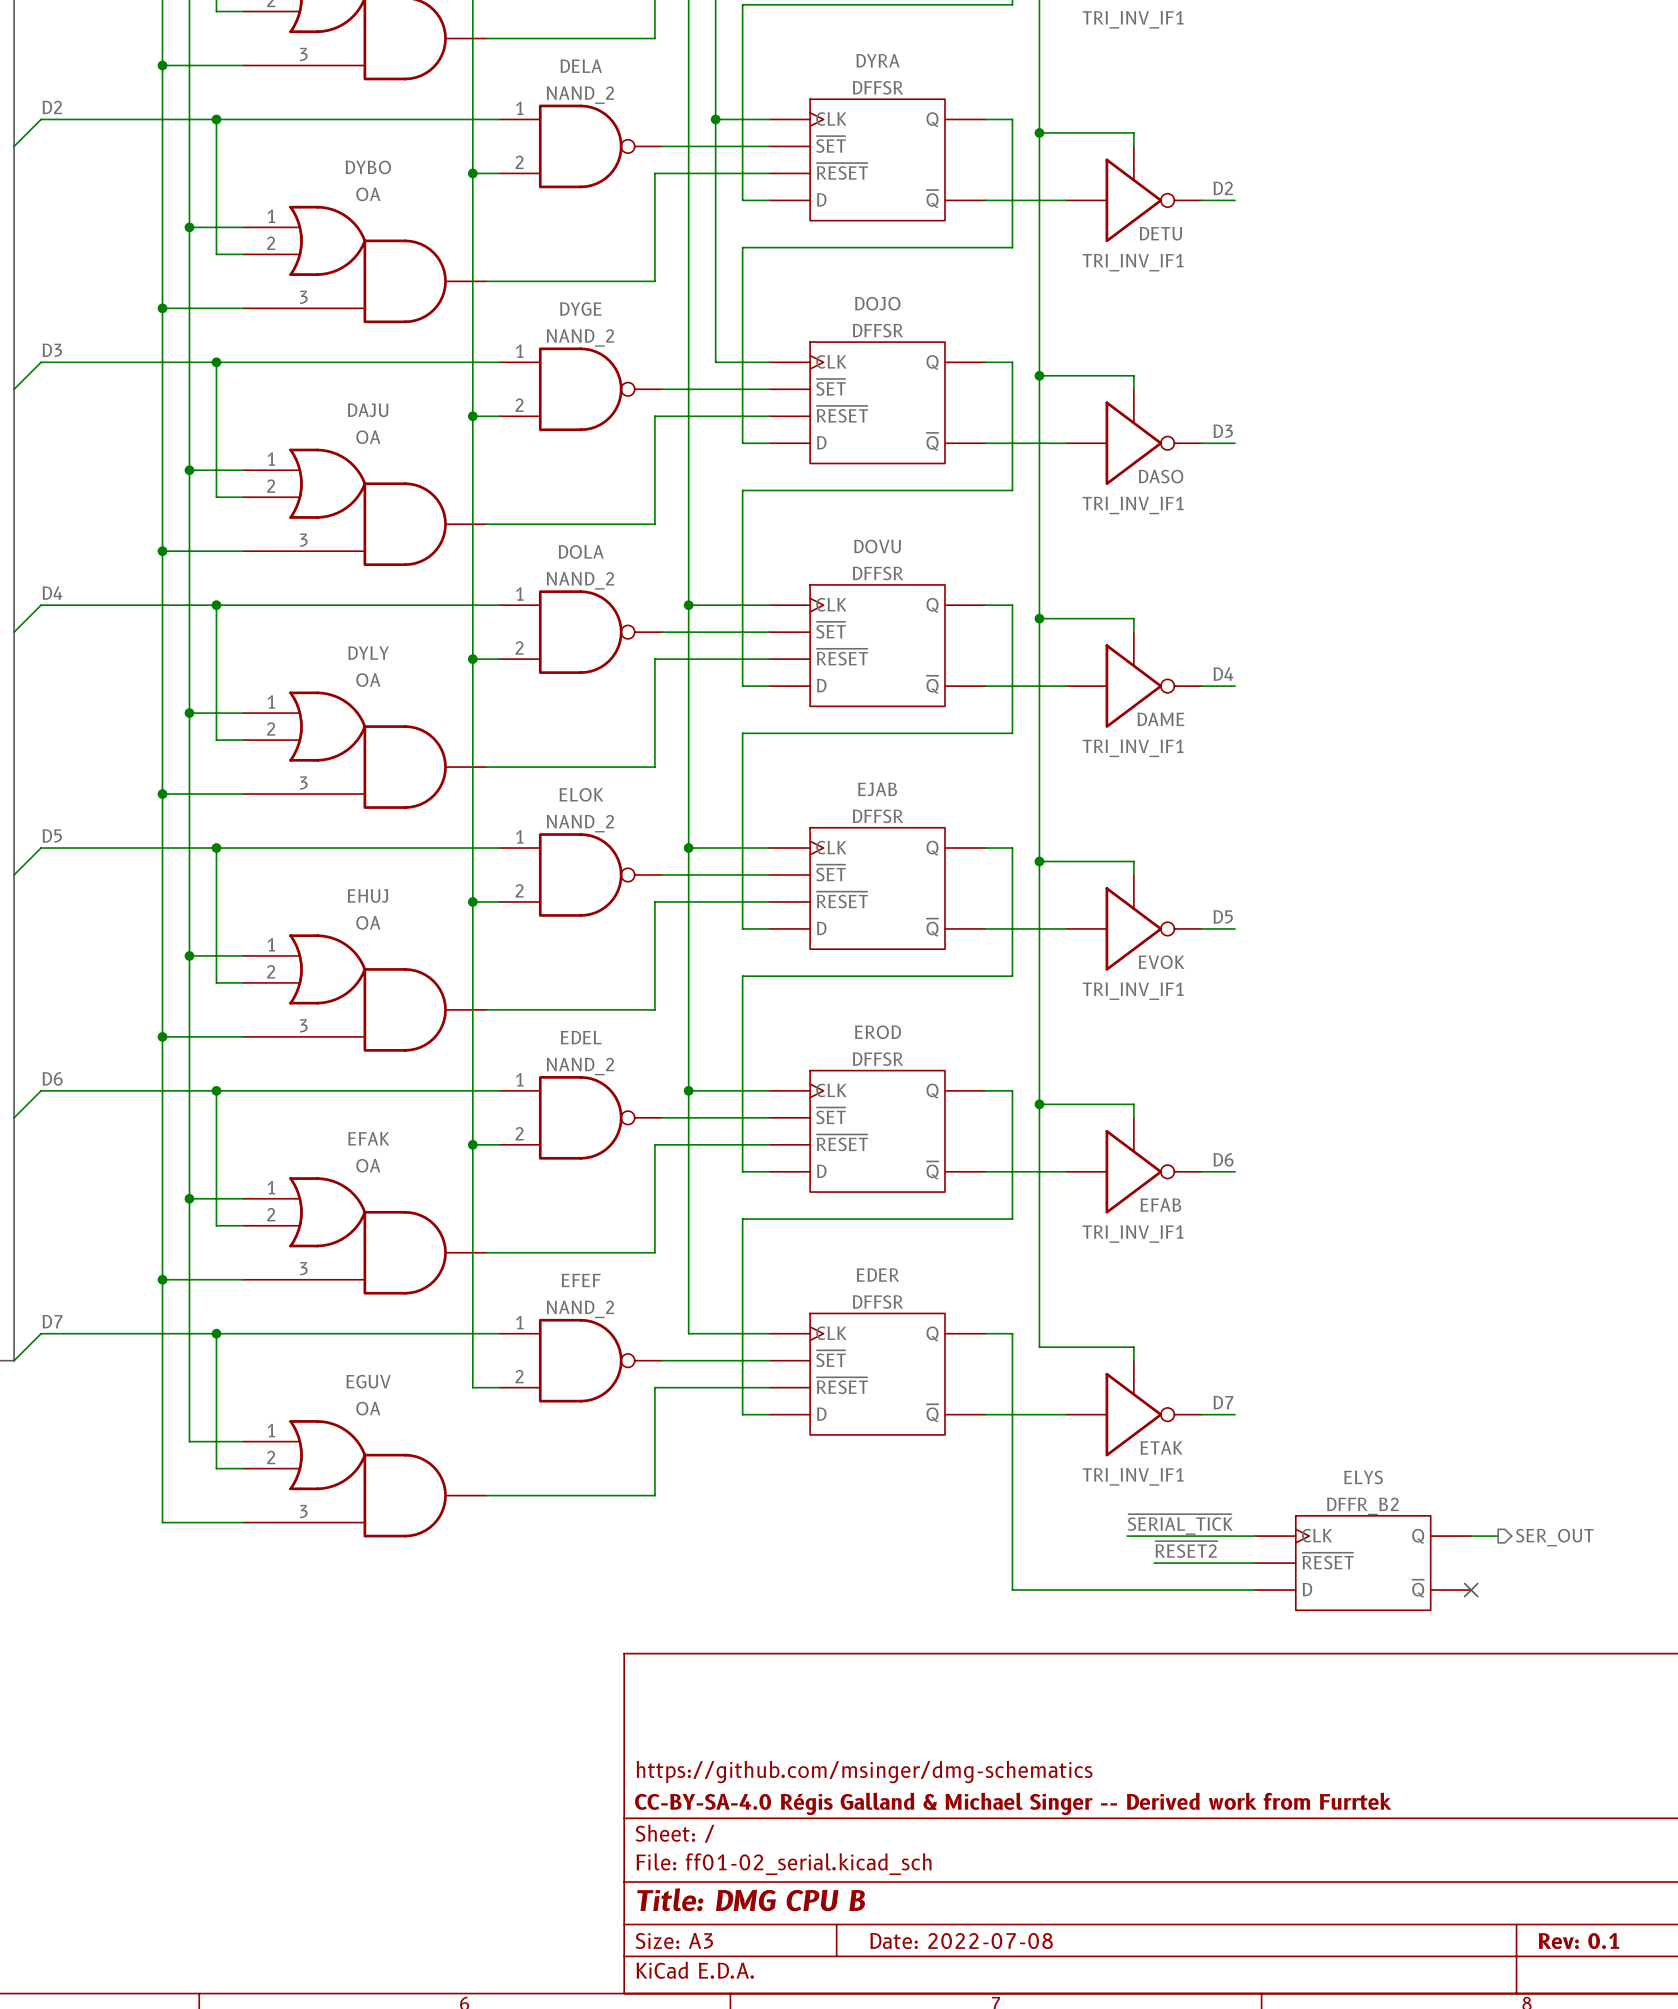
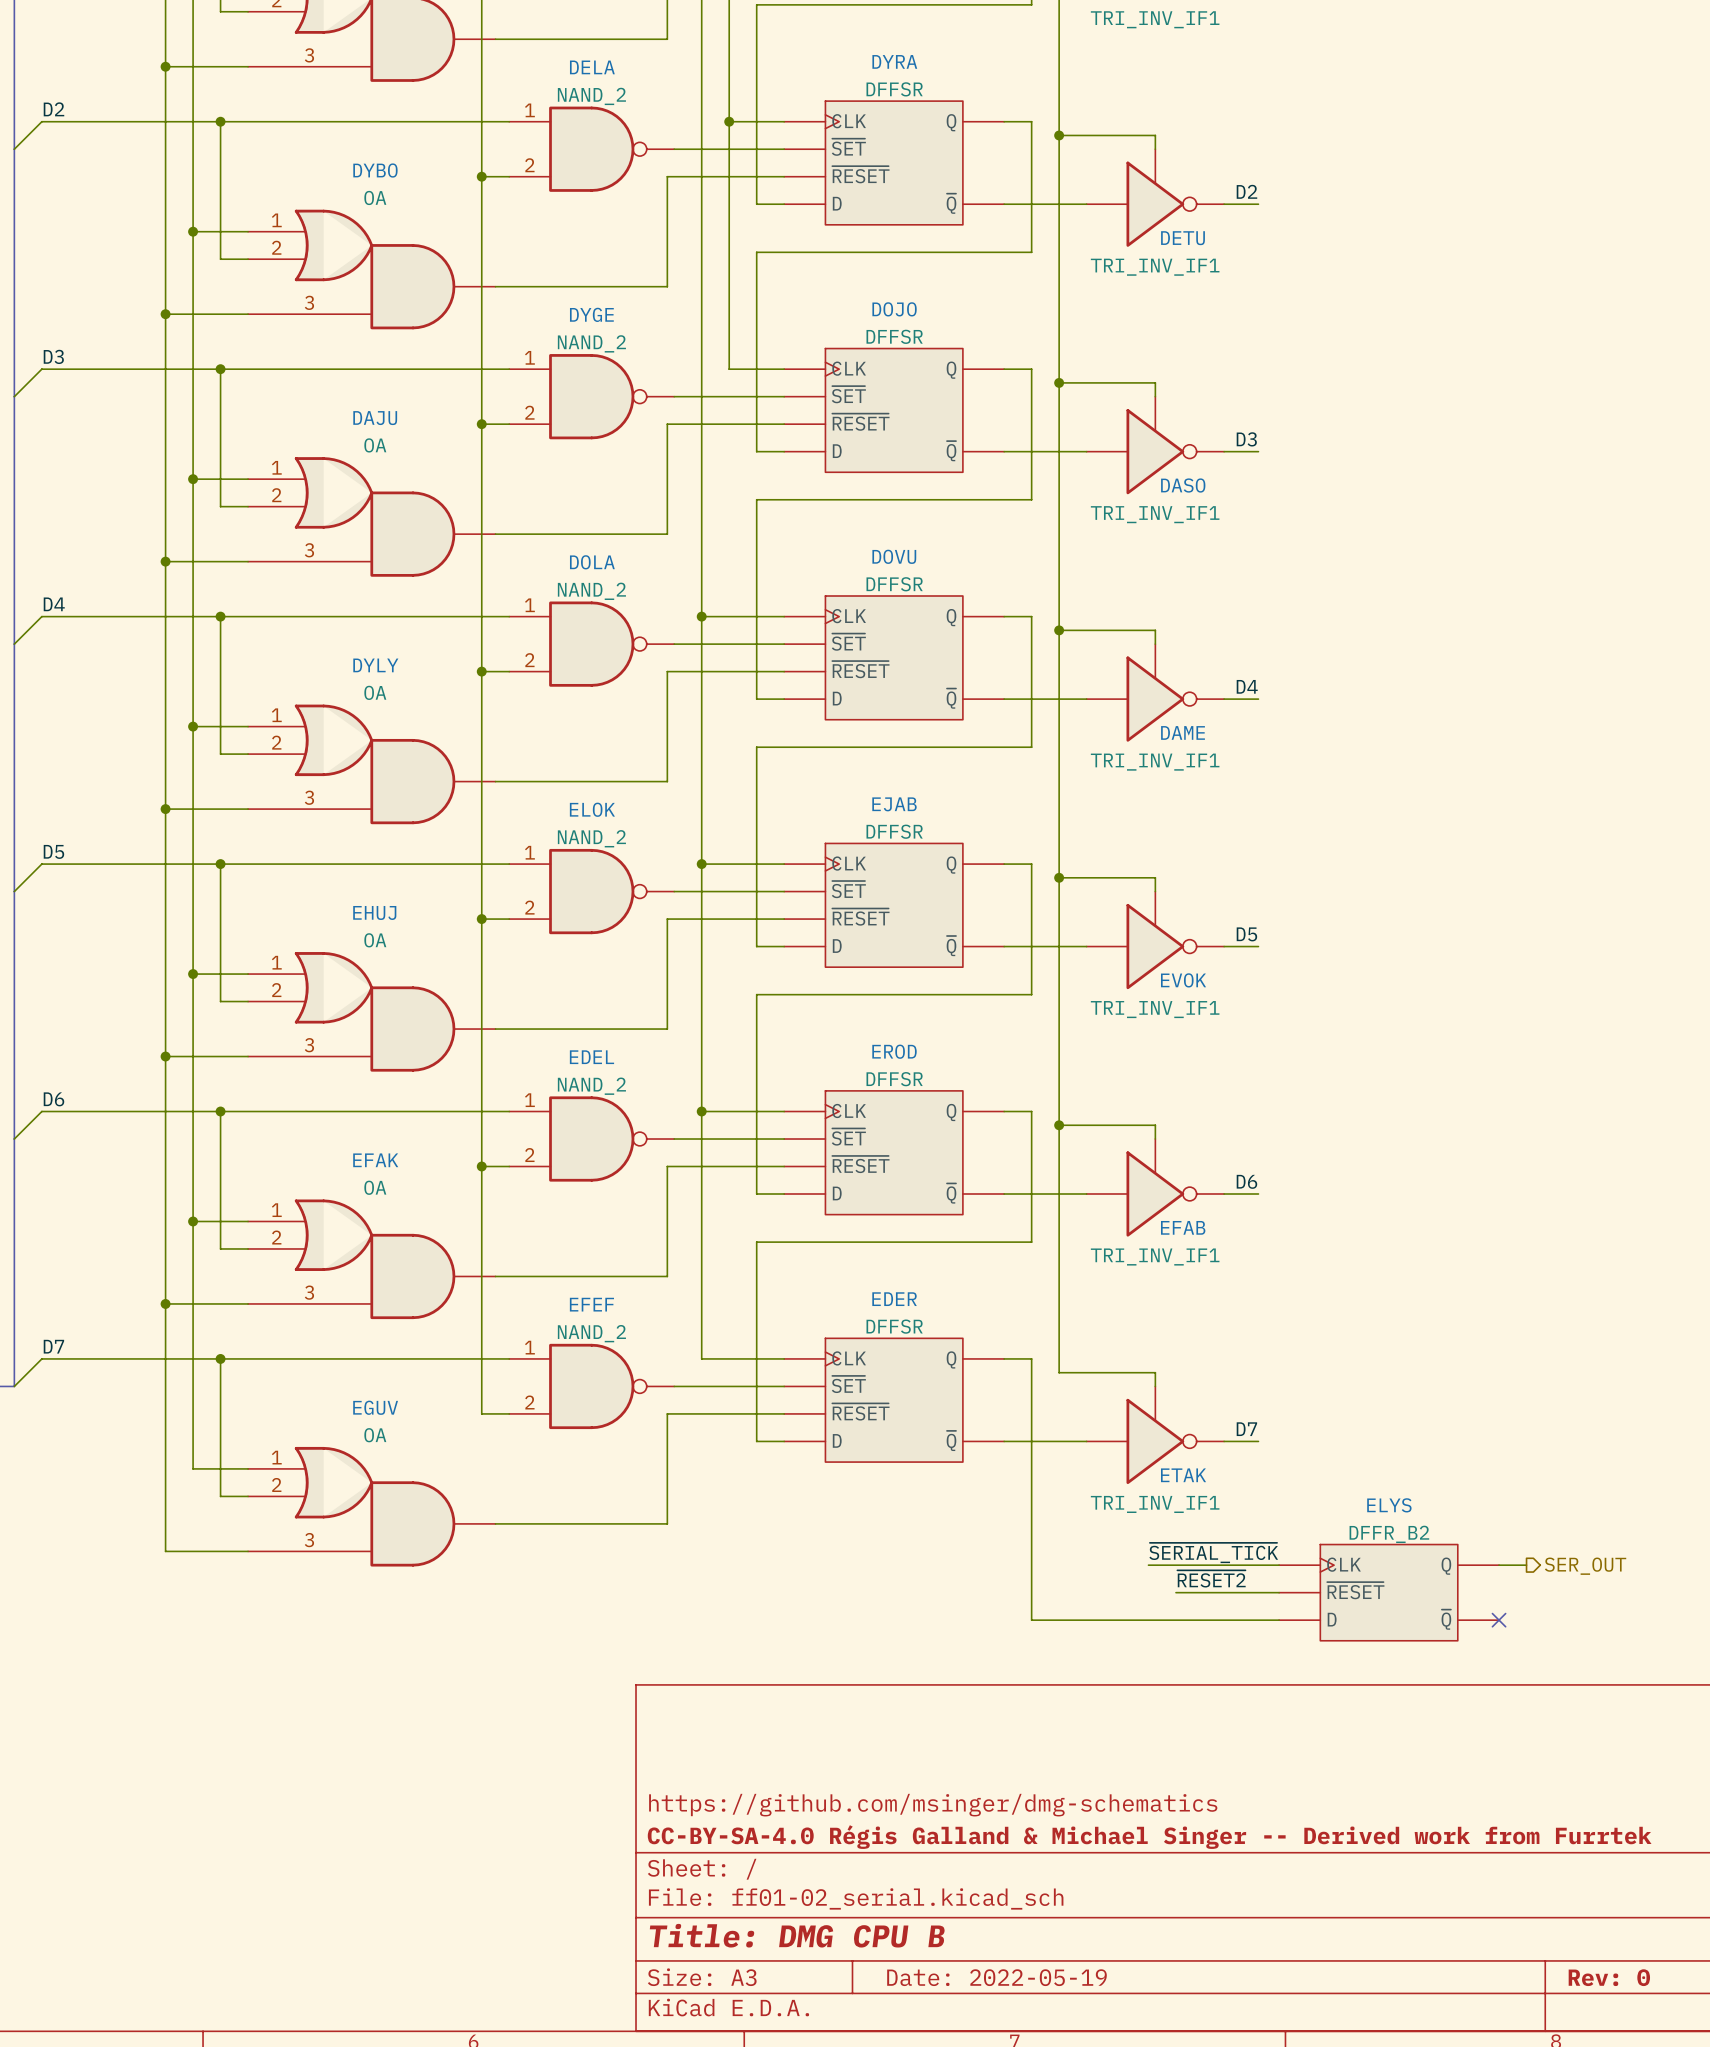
title block: Date: 2022-07-08 (961, 1941) -> Date: 2022-05-19 (996, 1977)
title block: Rev: 0.1 (1578, 1941) -> Rev: 0 (1609, 1977)

